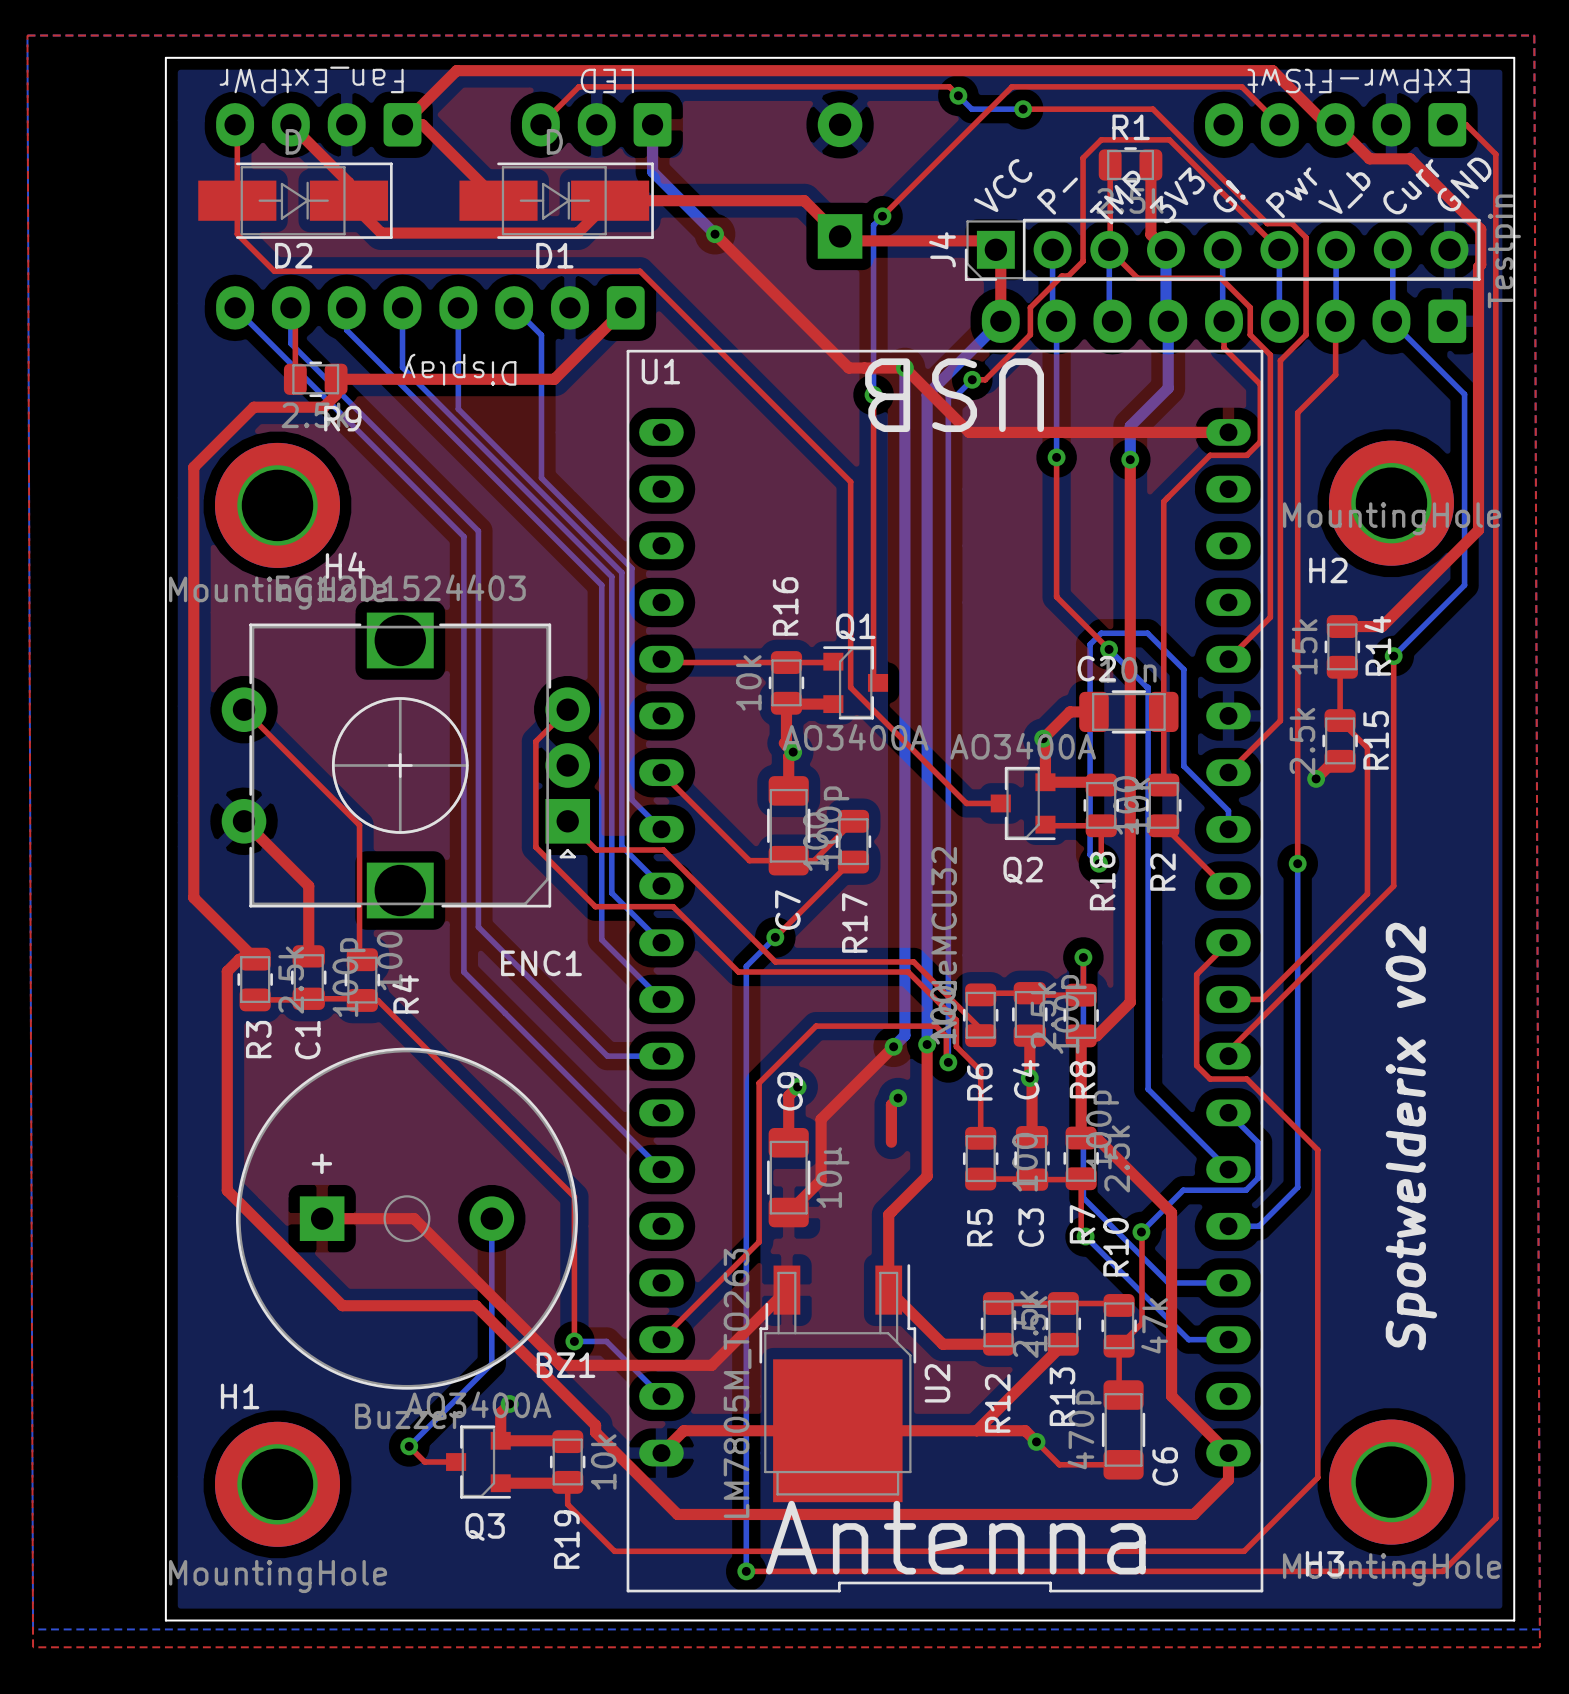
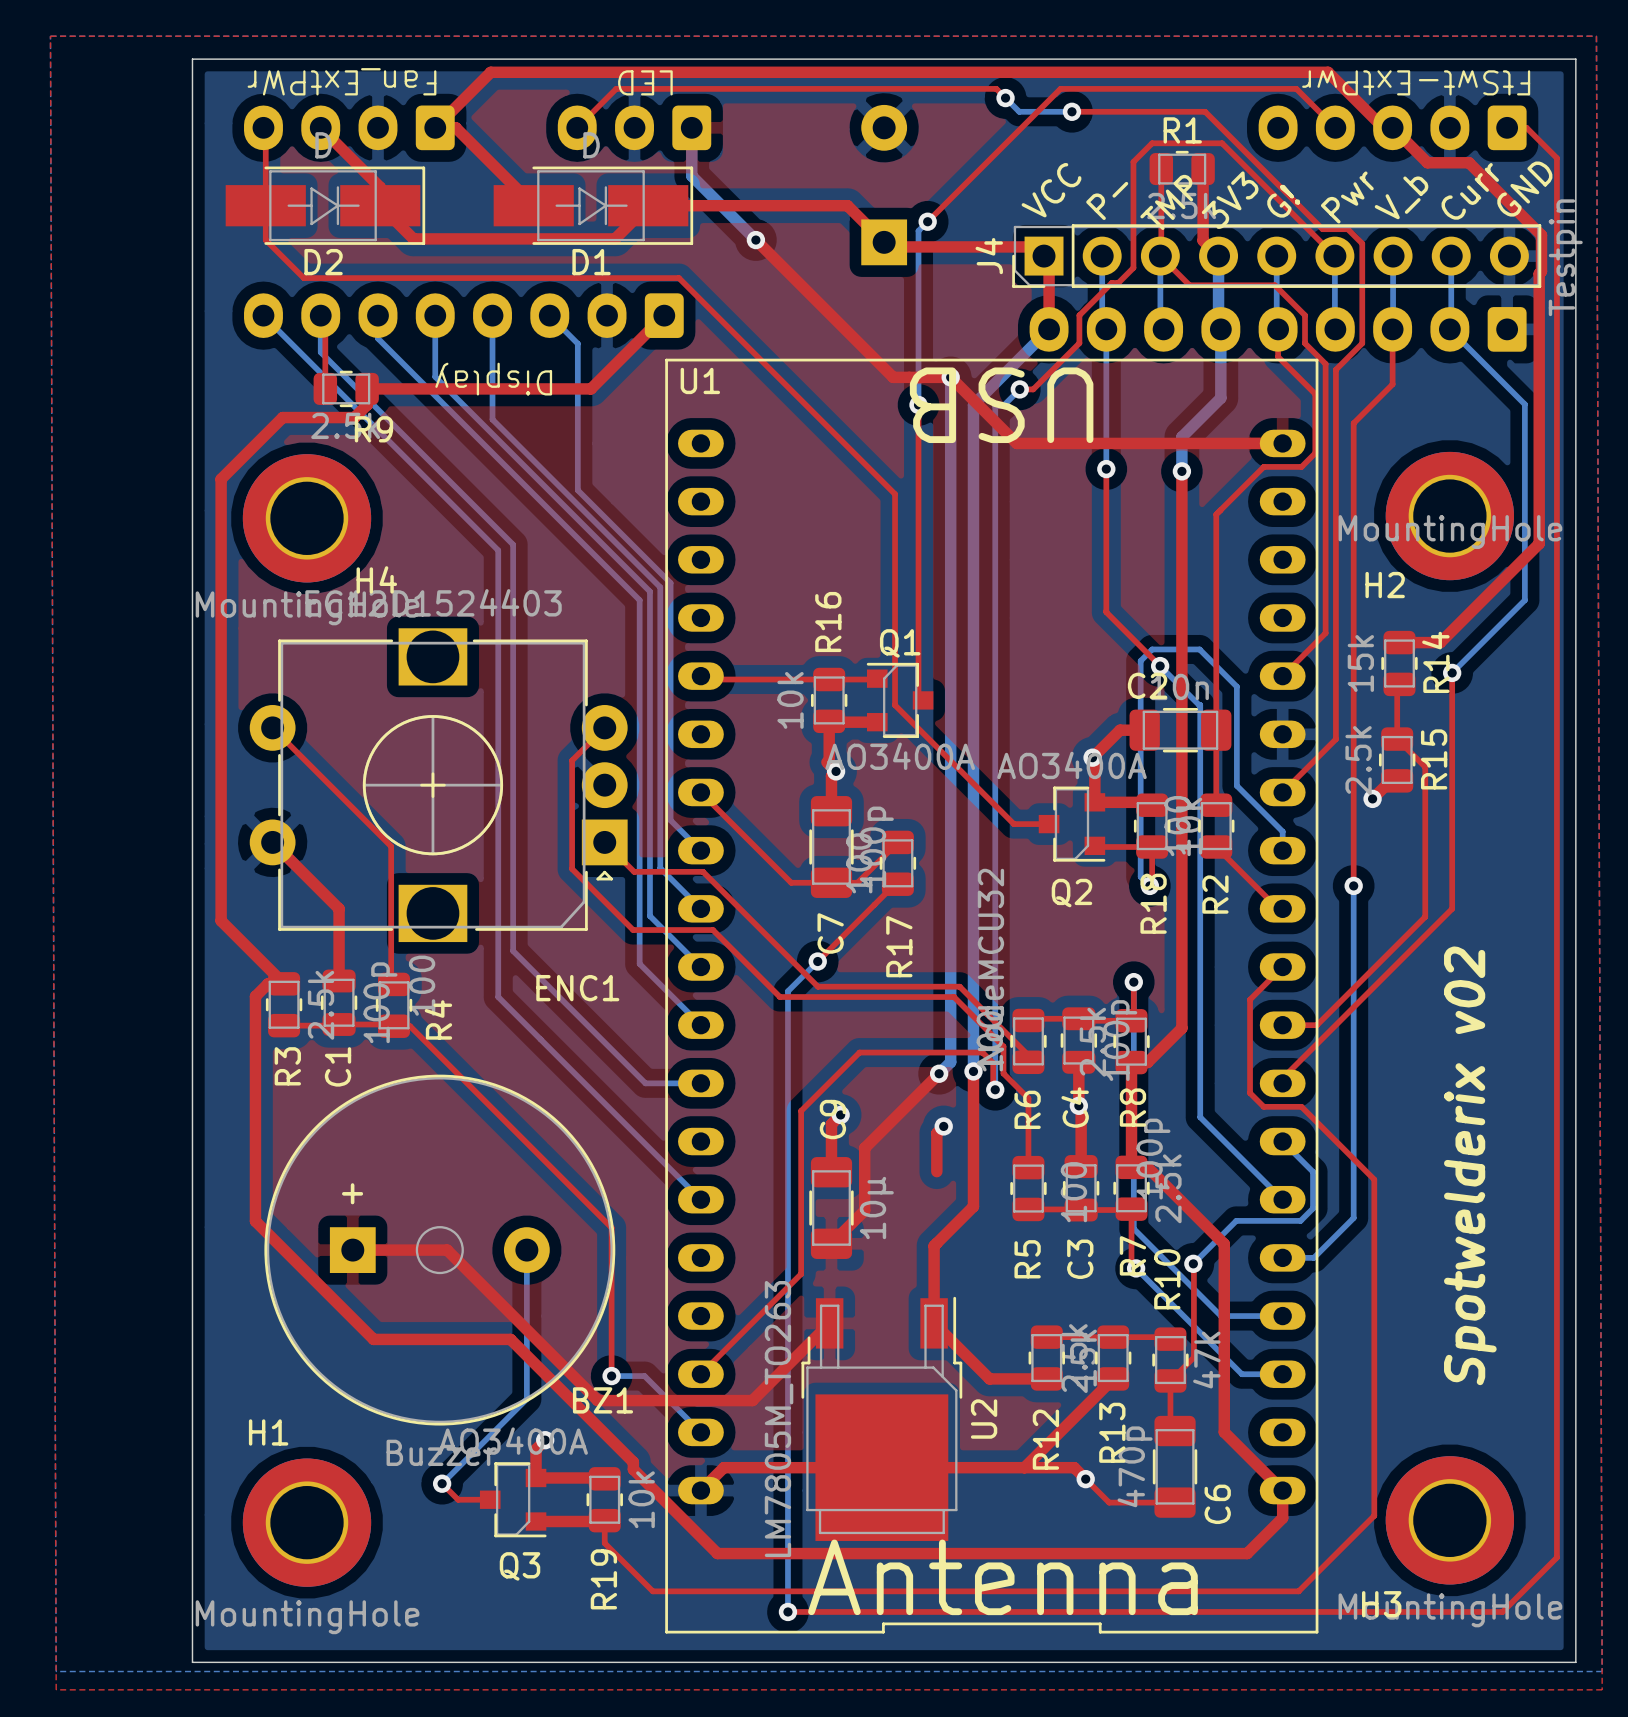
text: ExtPwr-FtSwt (1358, 80) -> FtSwt-ExtPwr (1416, 82)

